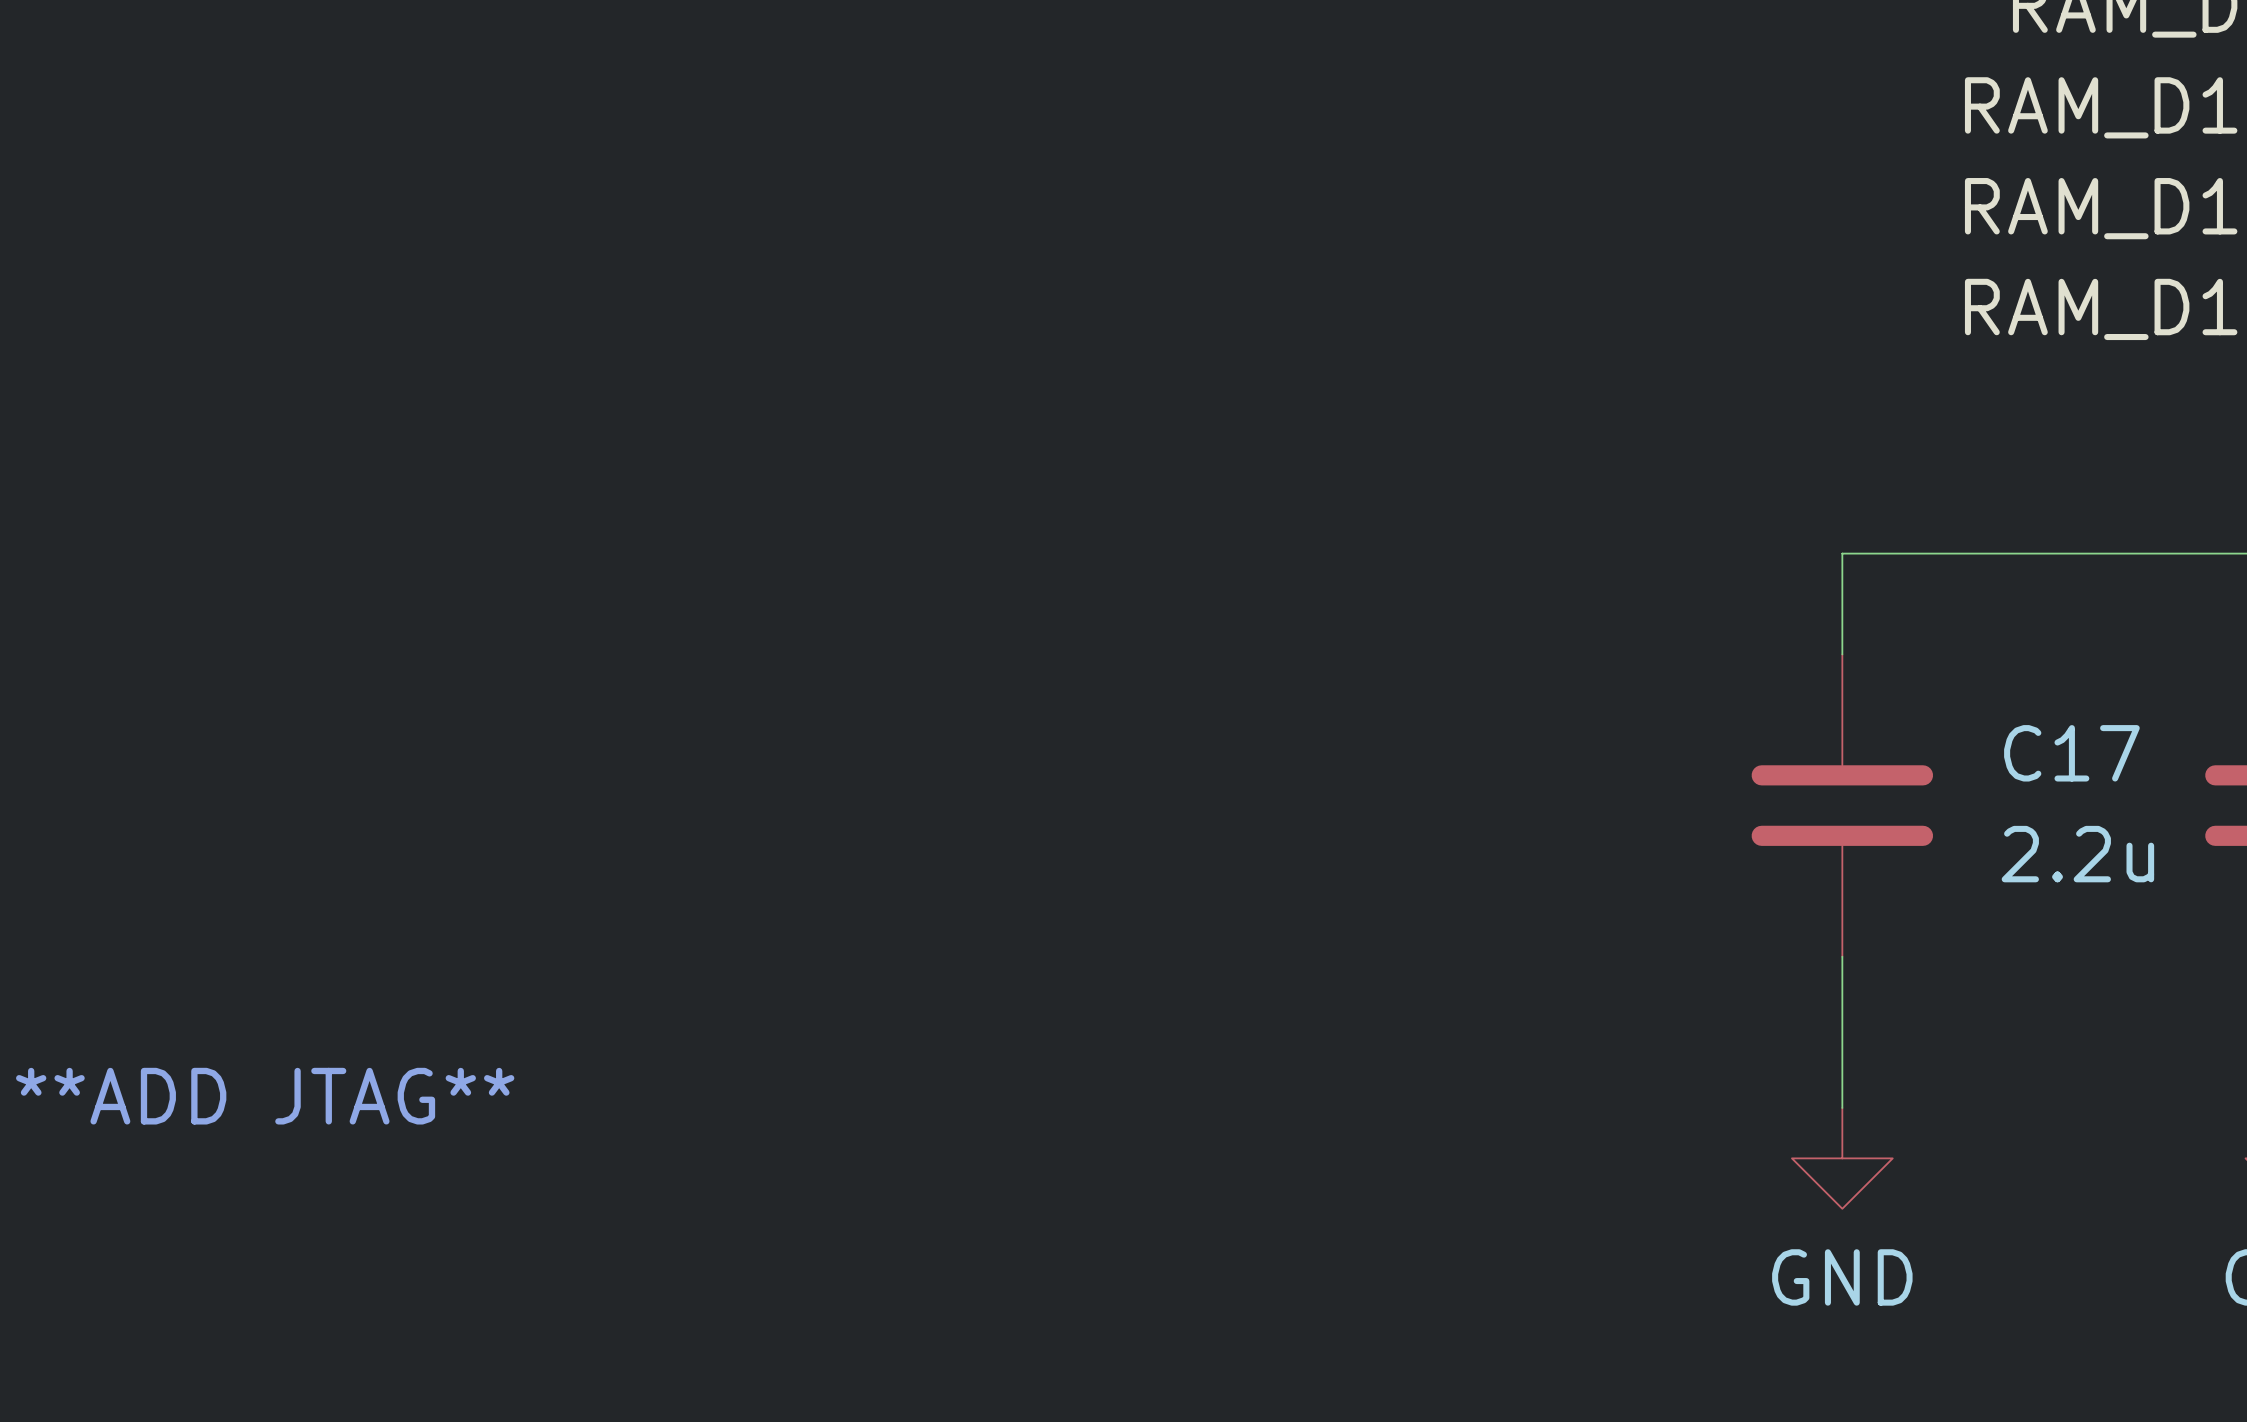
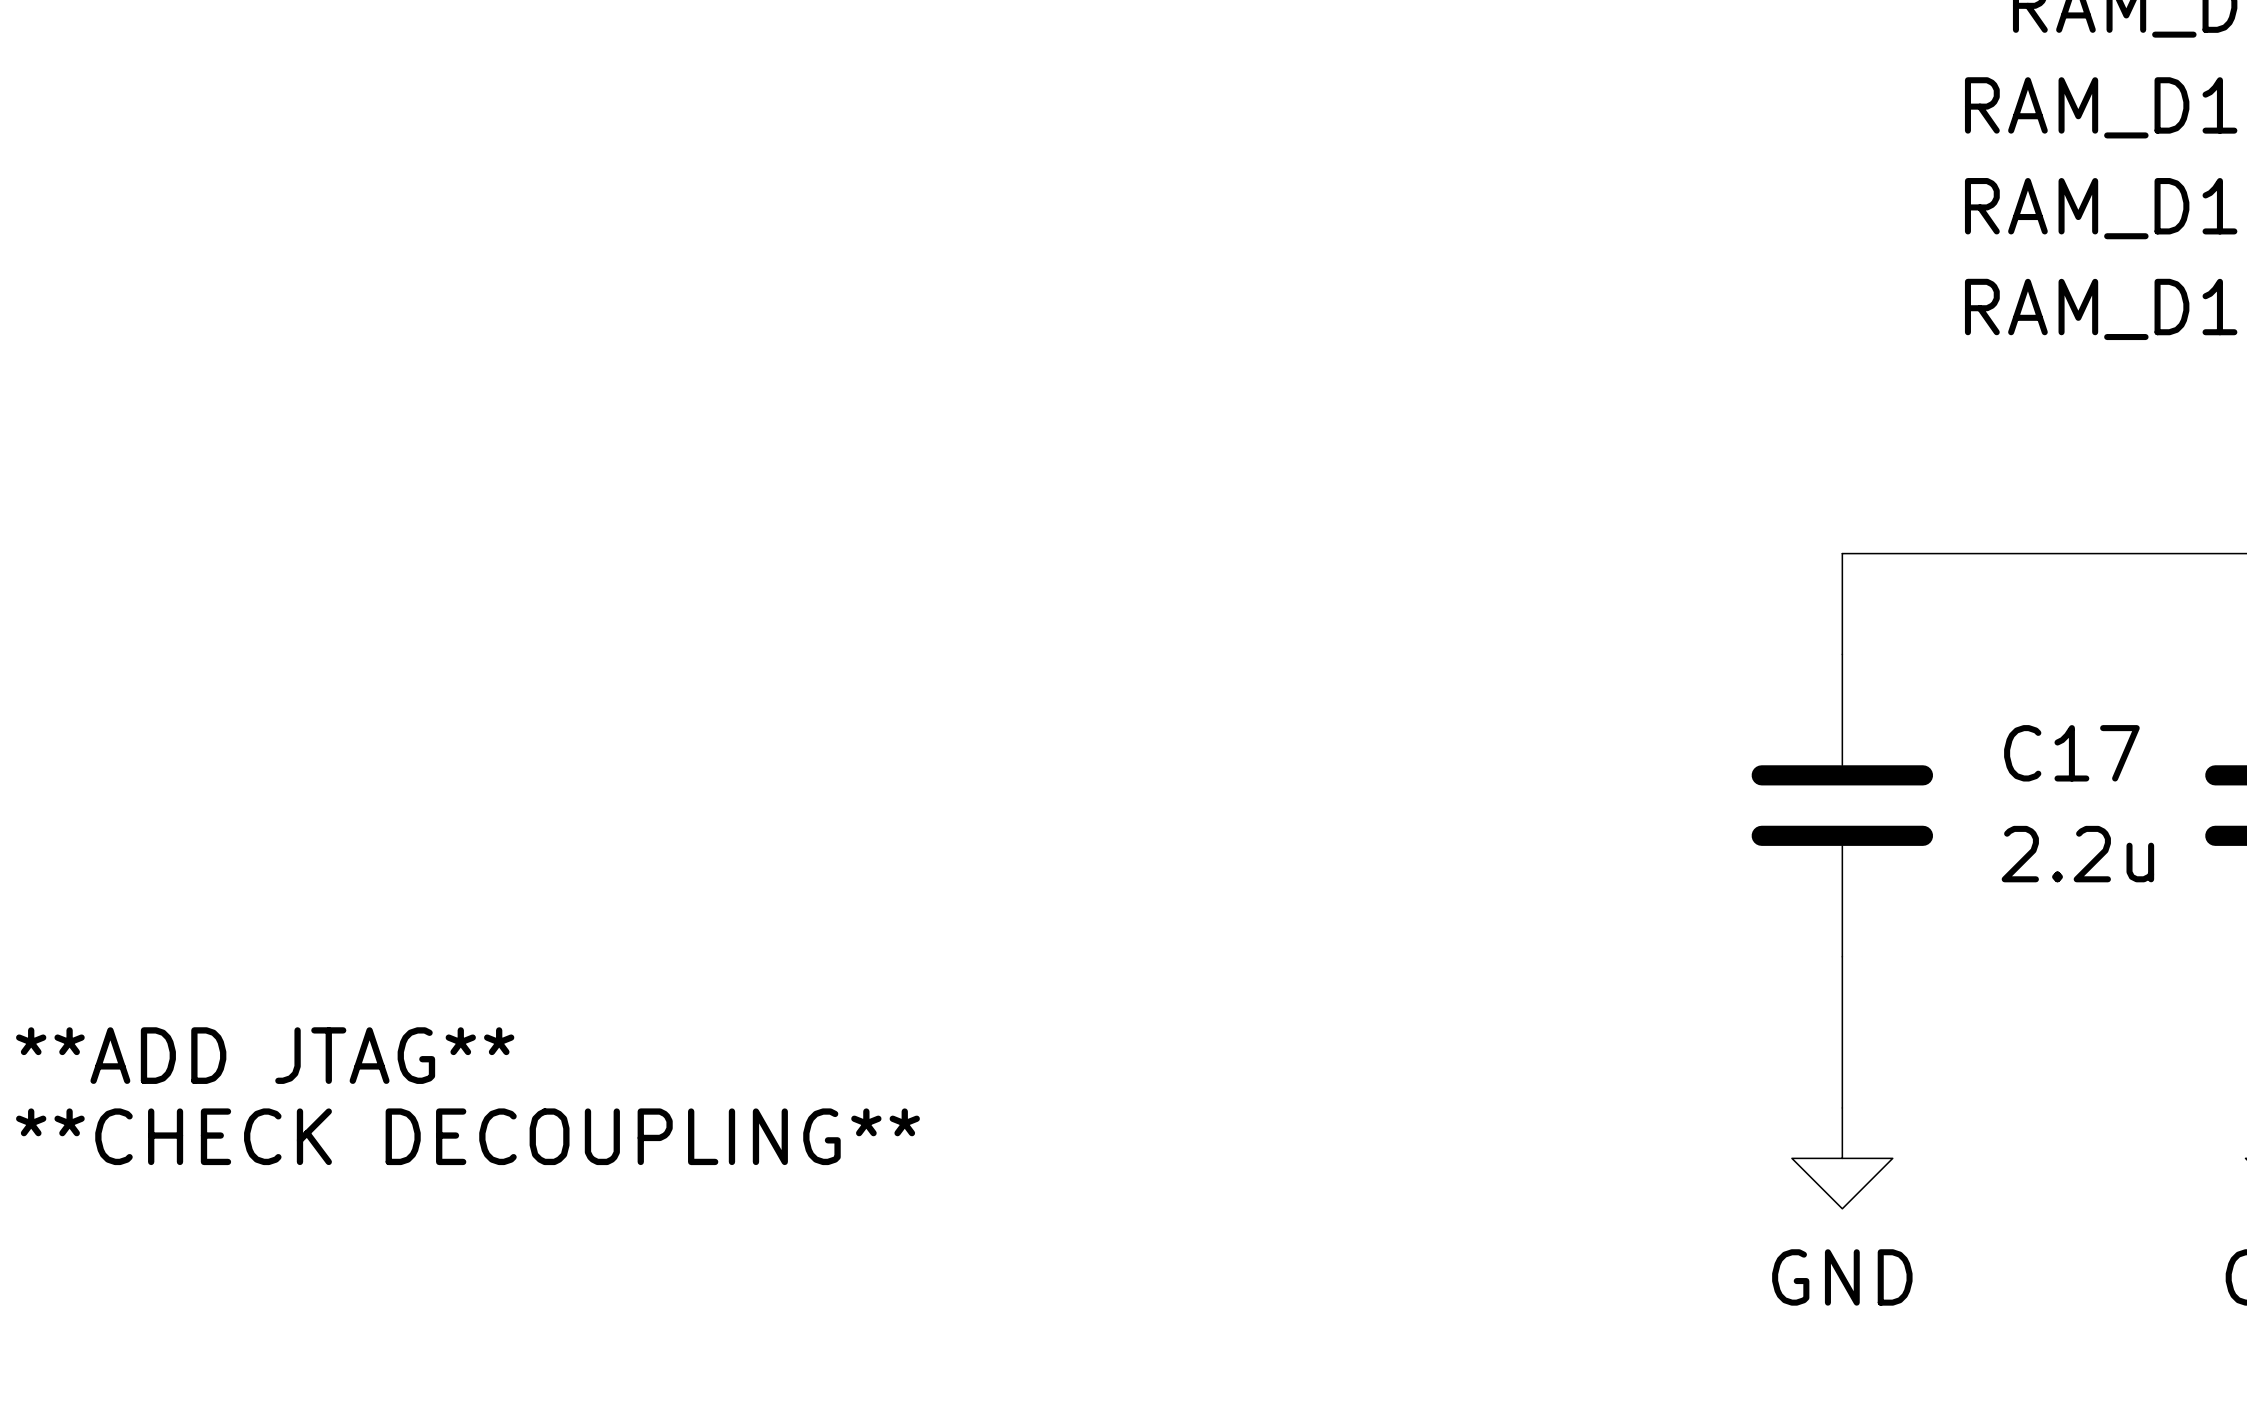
text position: **ADD JTAG** (265, 1096) -> **ADD JTAG** (265, 1055)
text: none -> **CHECK DECOUPLING** (467, 1136)

